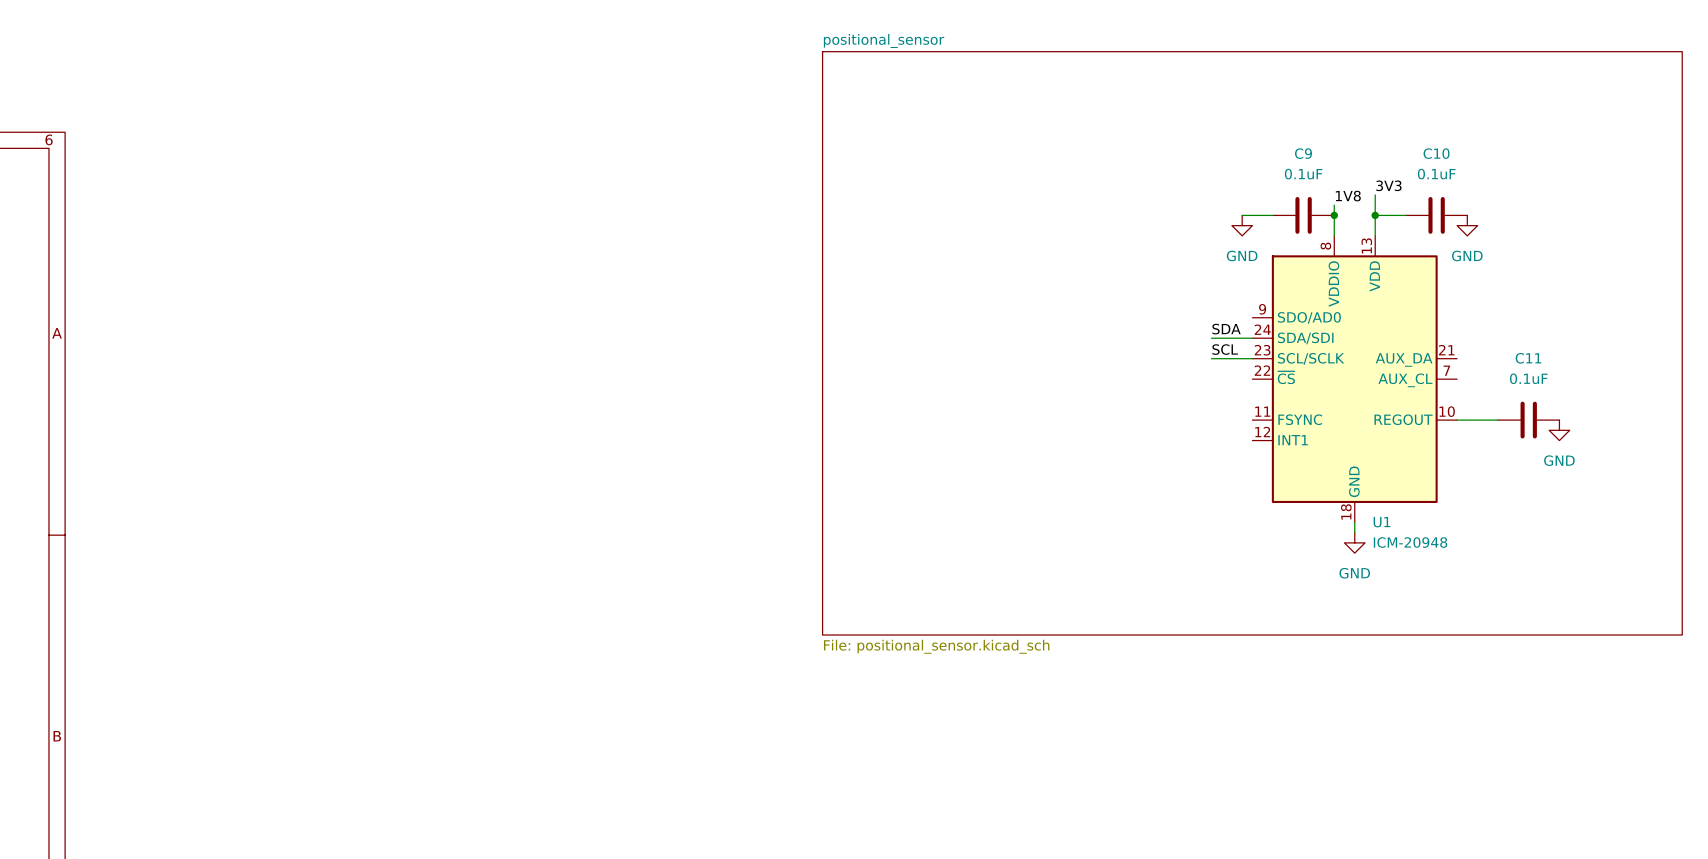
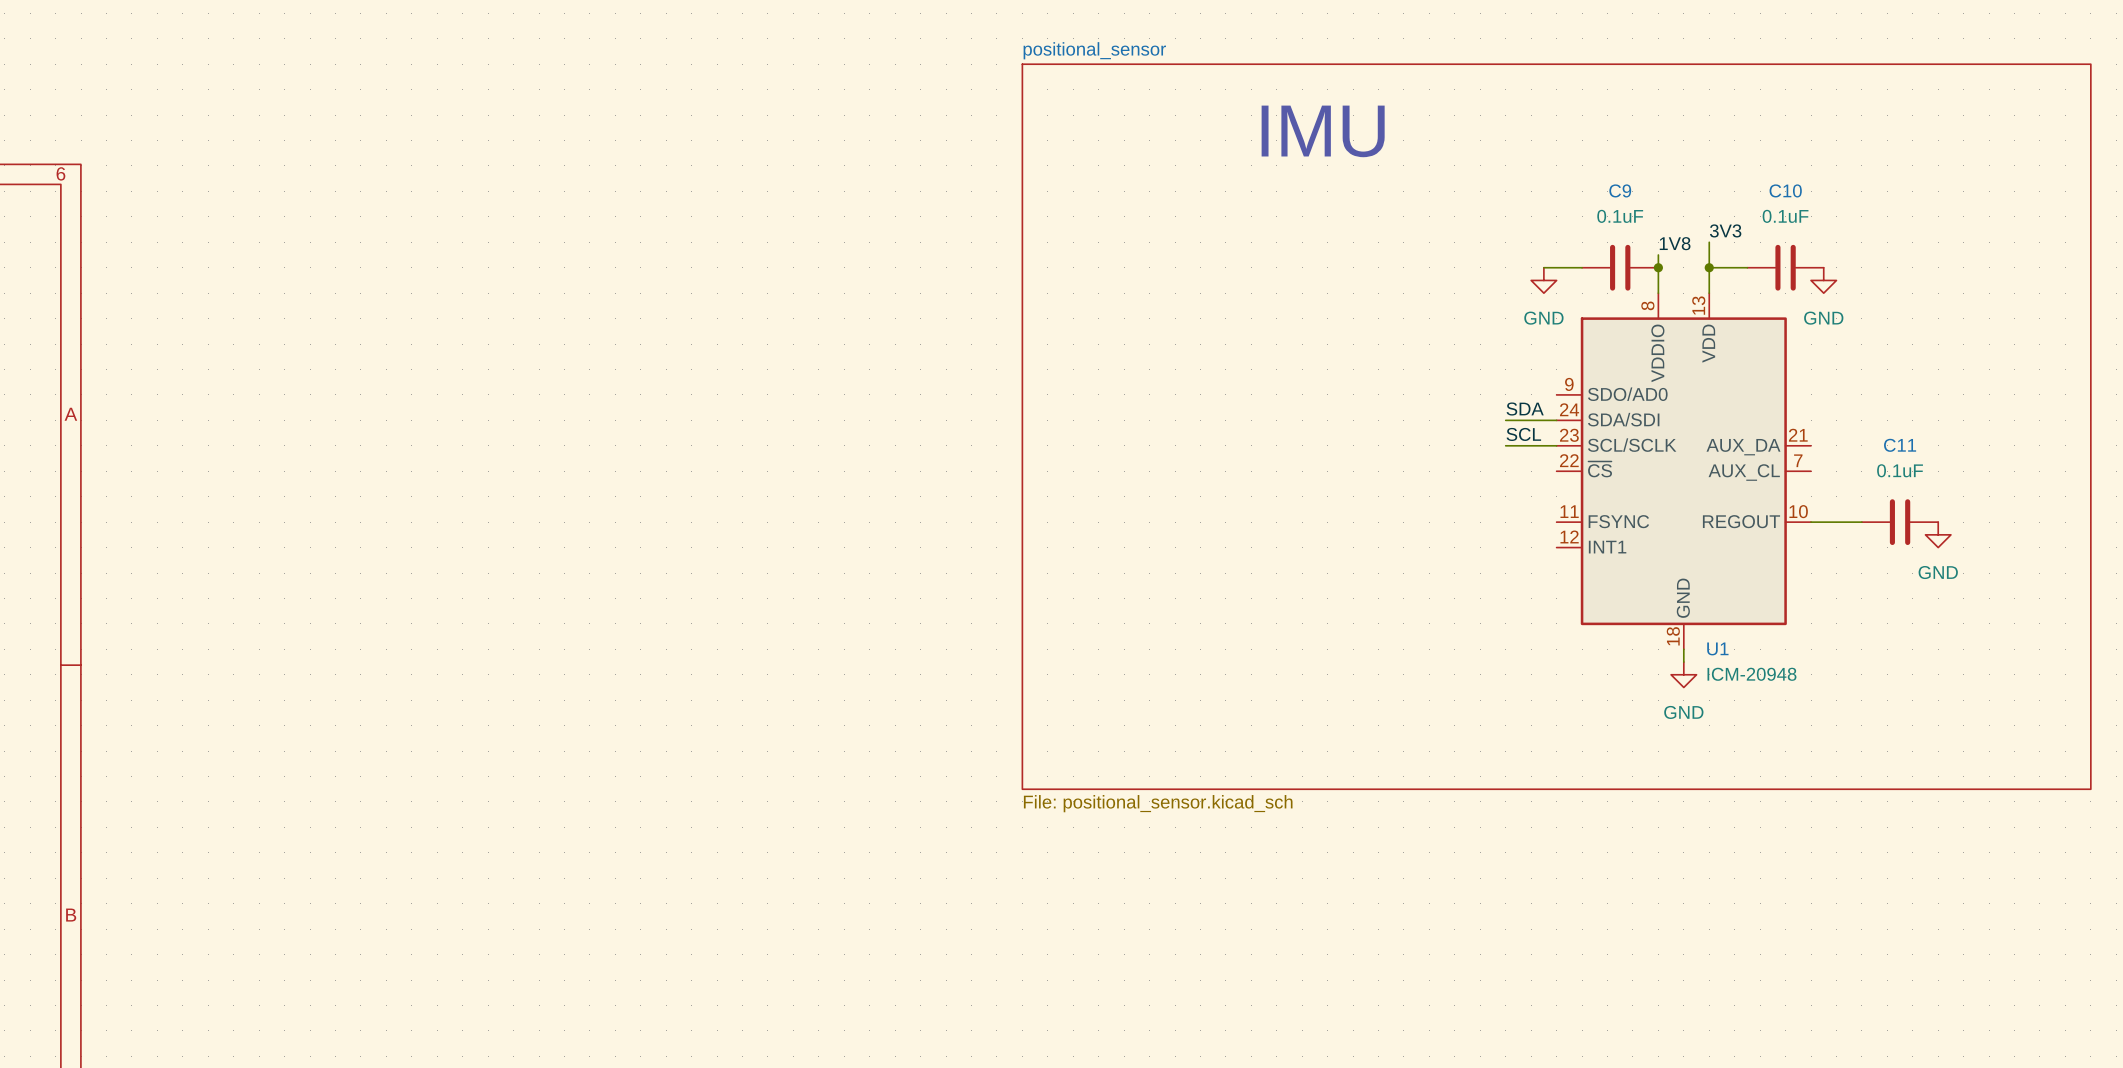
text: none -> IMU (1323, 131)

